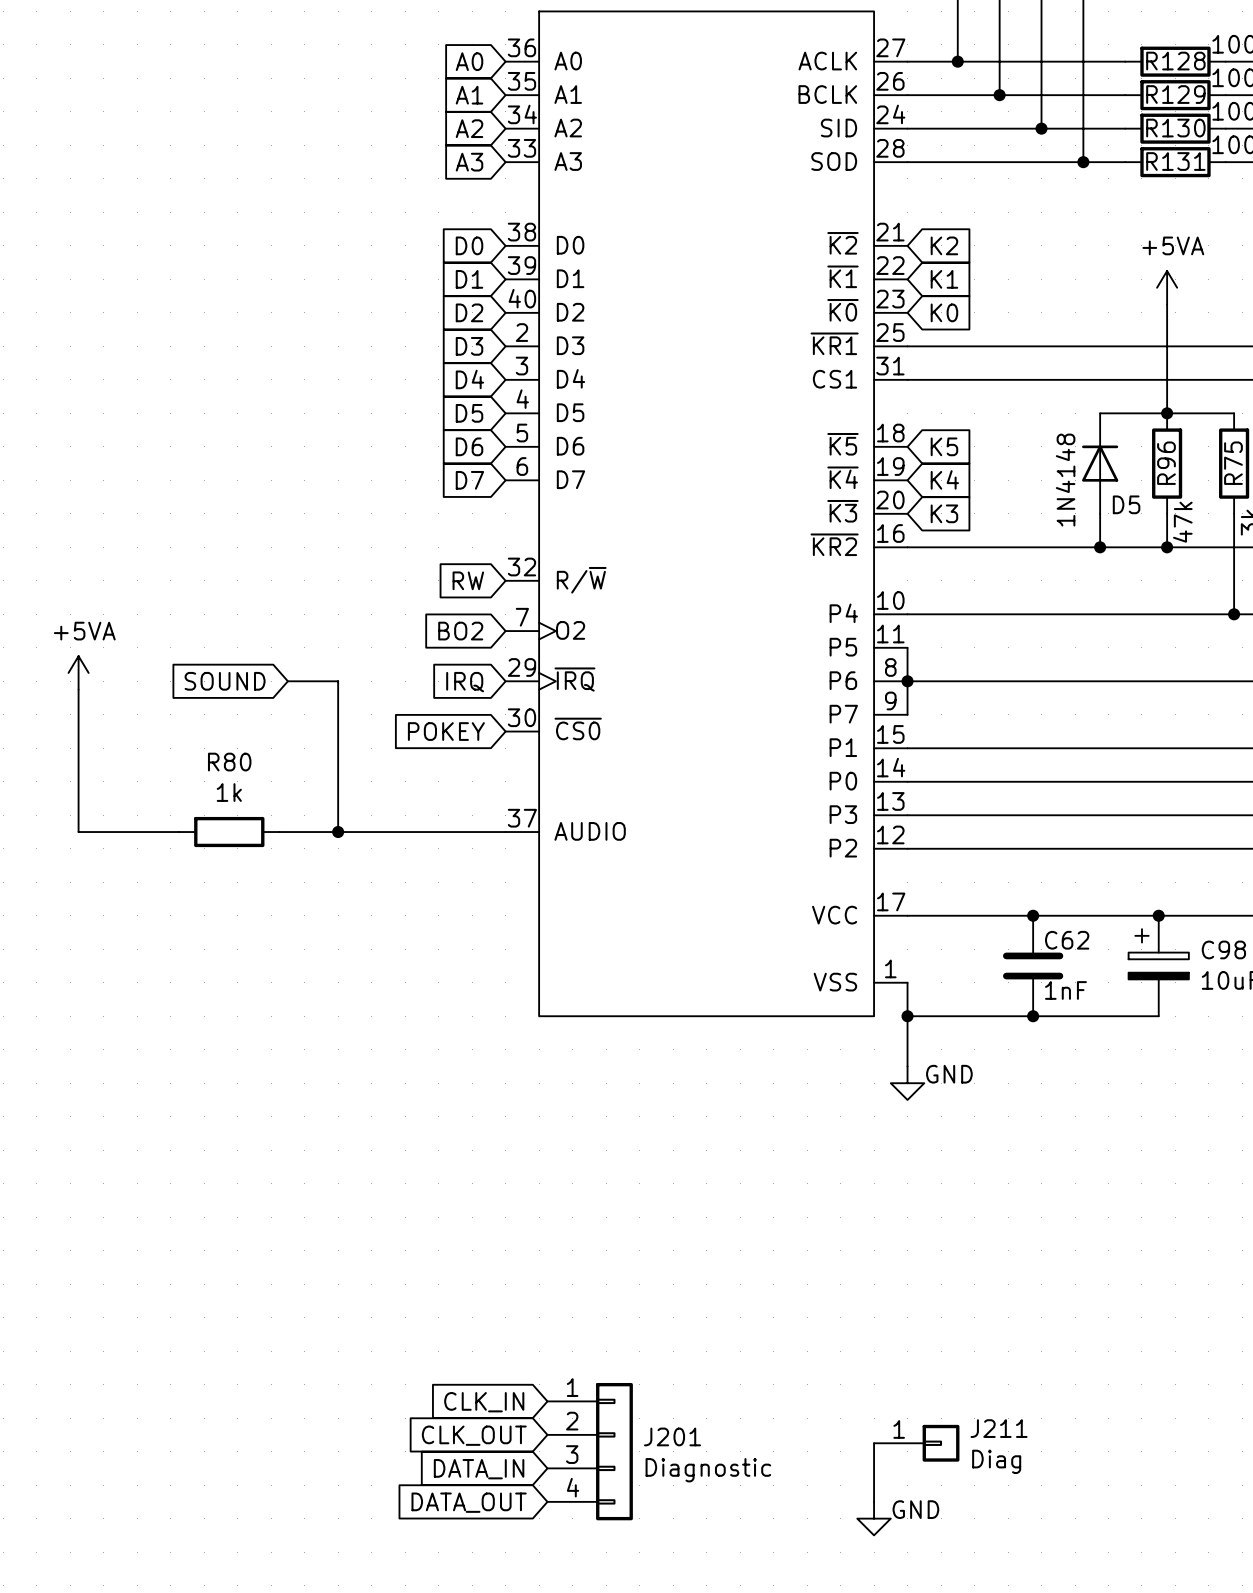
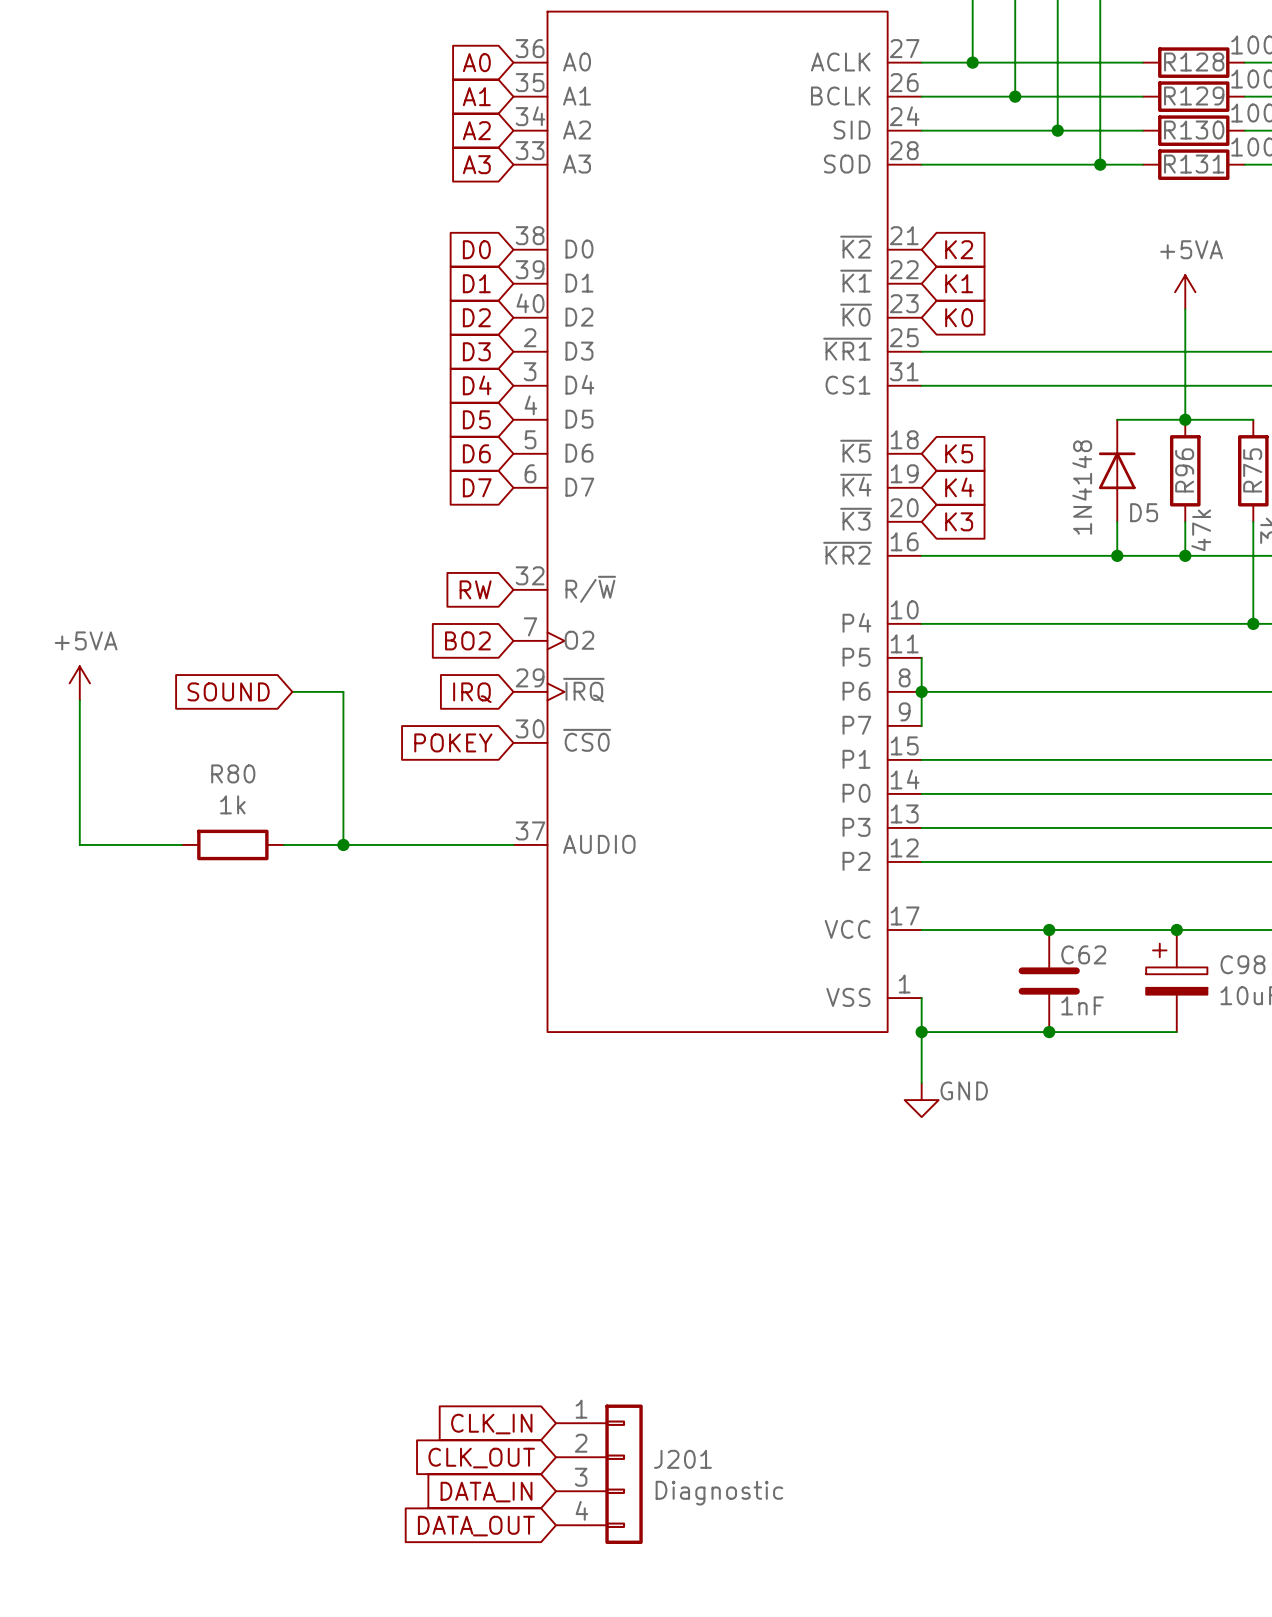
wire: (874, 1443) (874, 1501) -> none
J211: Diag (916, 1443) -> none
power symbol: GND (874, 1518) -> none

